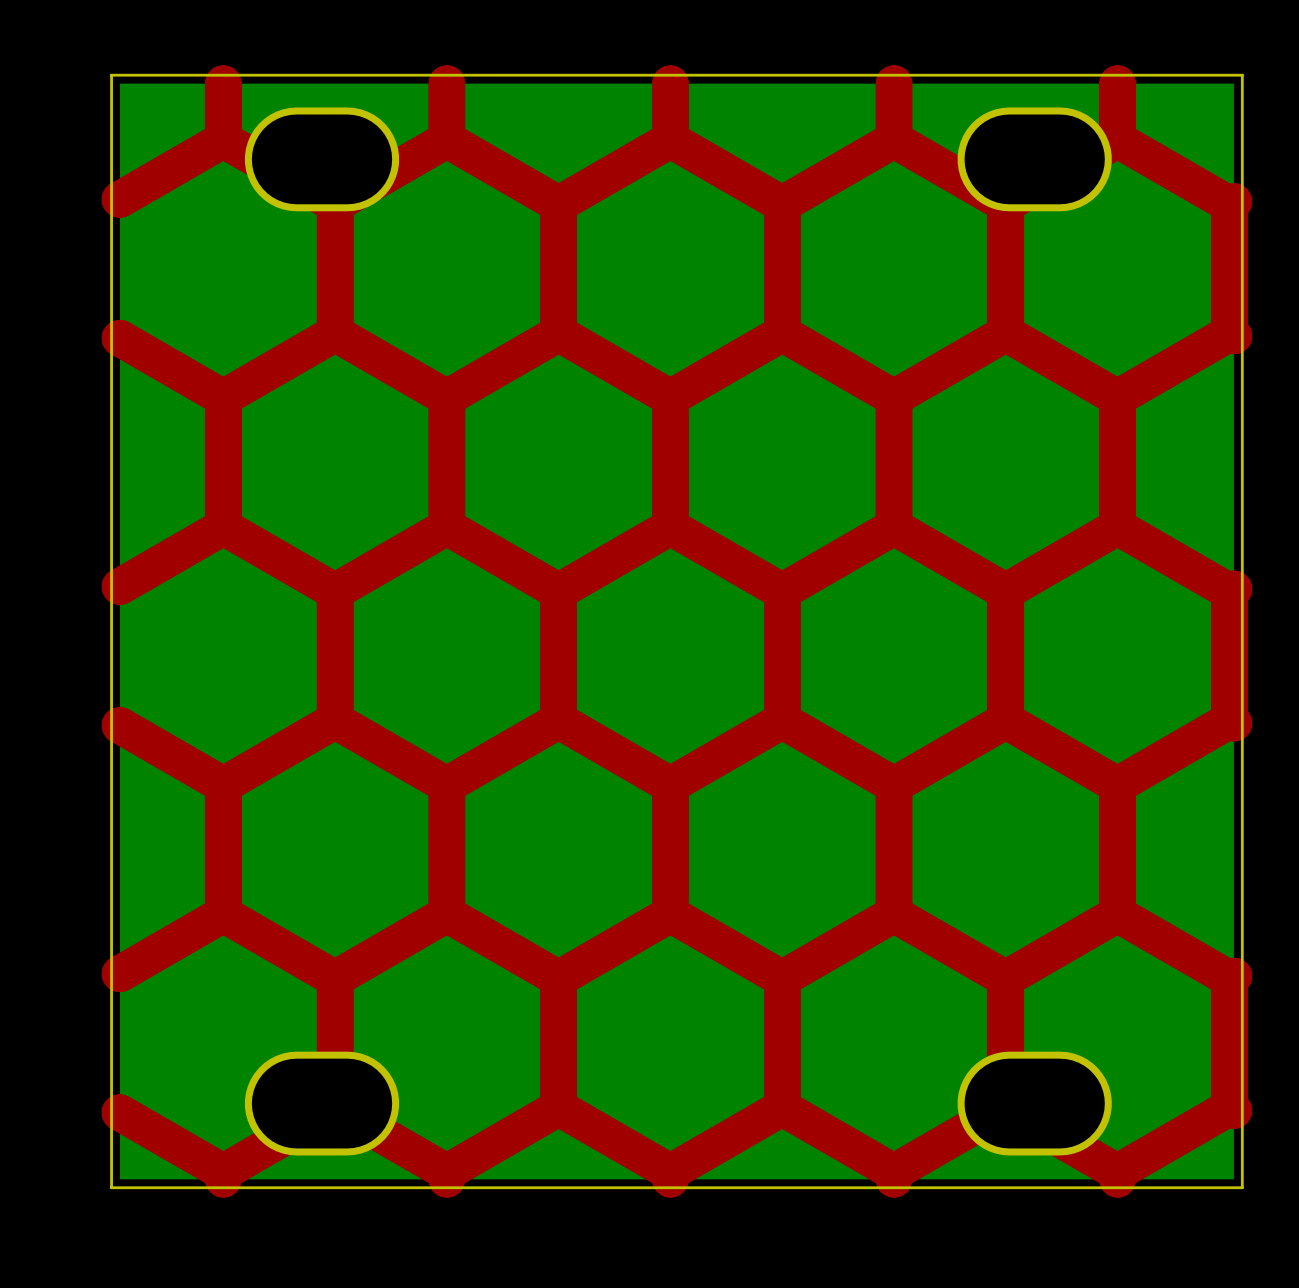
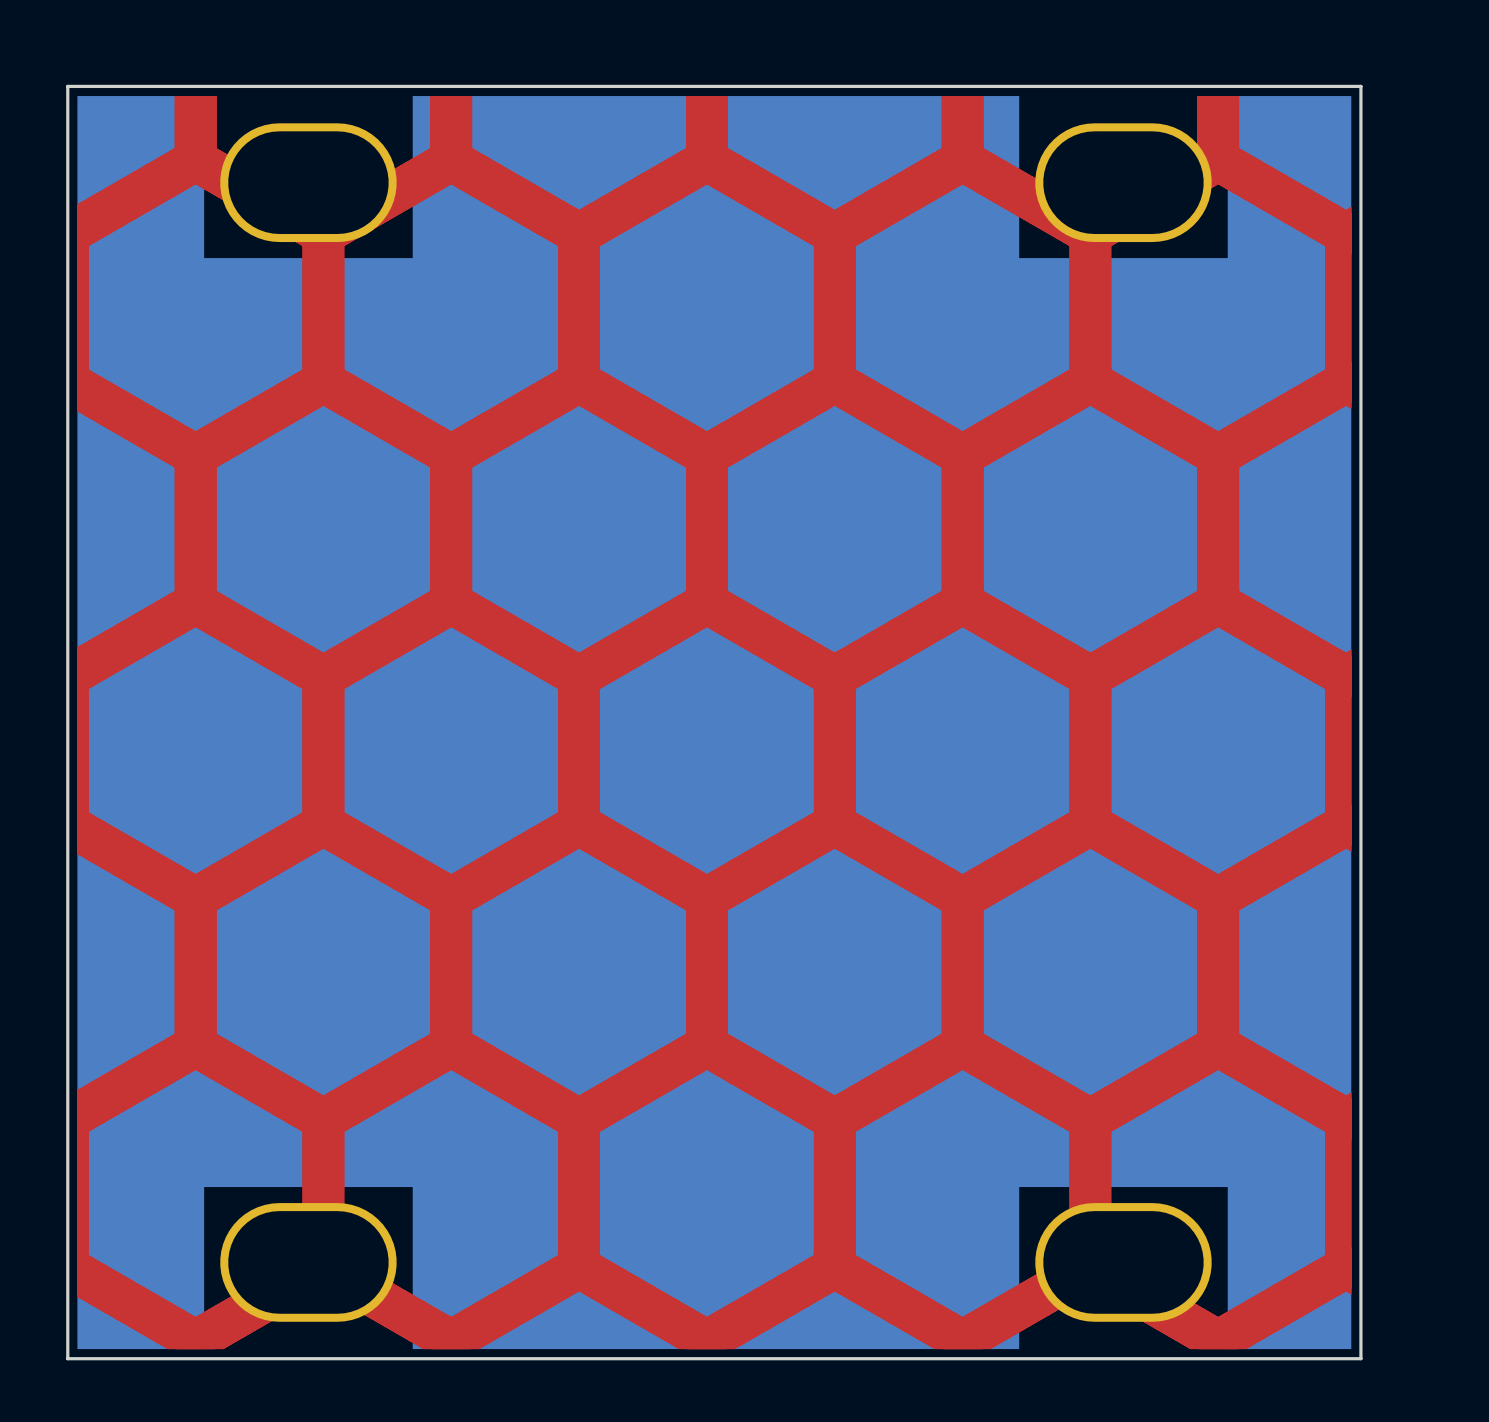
drawing shape: [119, 83, 1234, 1180] -> [204, 258, 1228, 1188]
drawing: none -> [77, 96, 1352, 1350]

